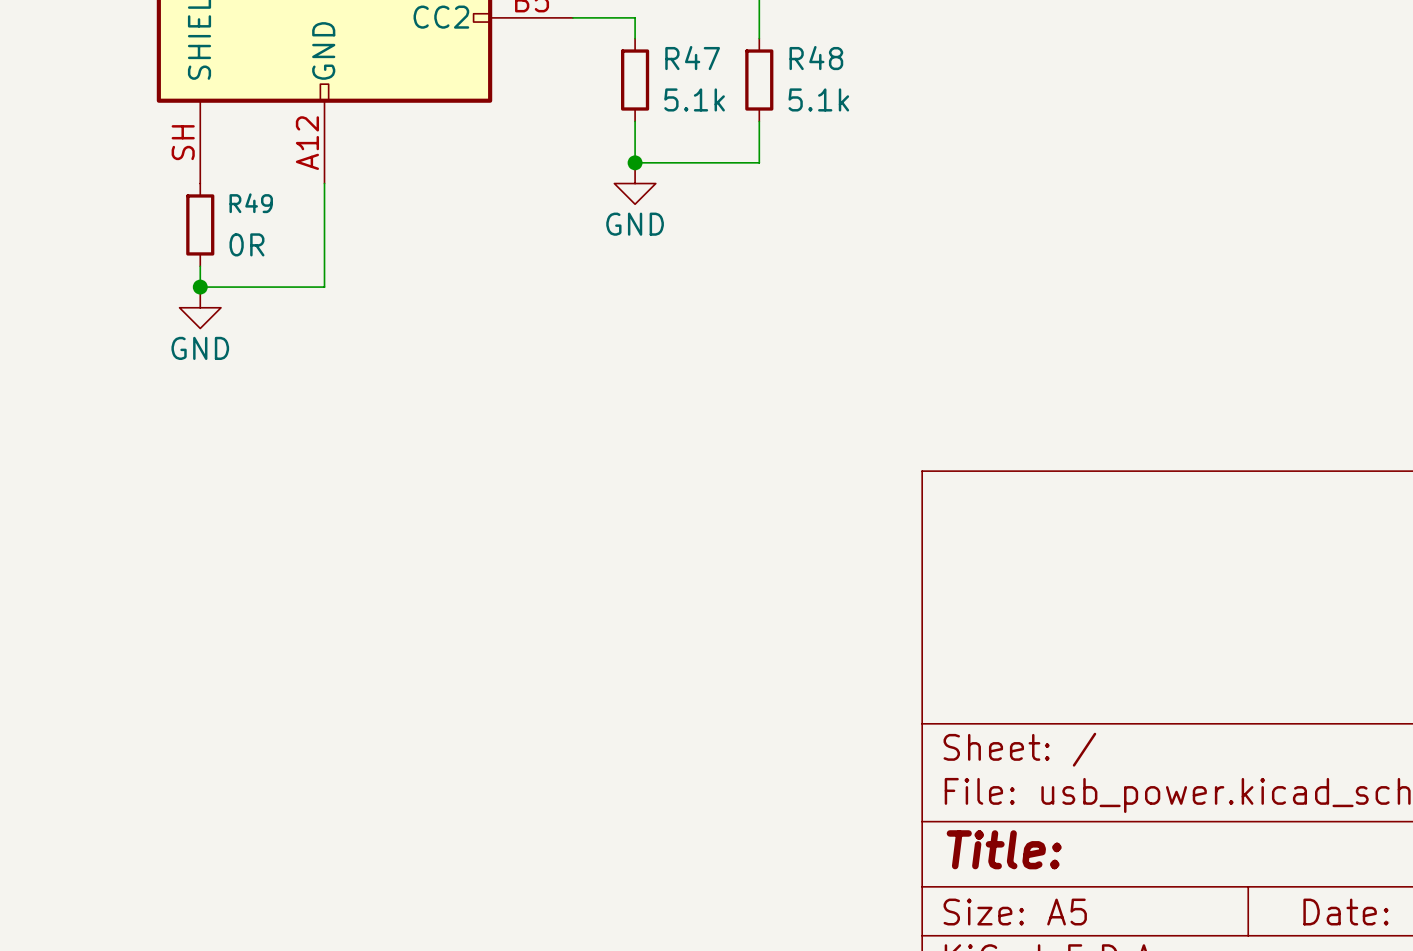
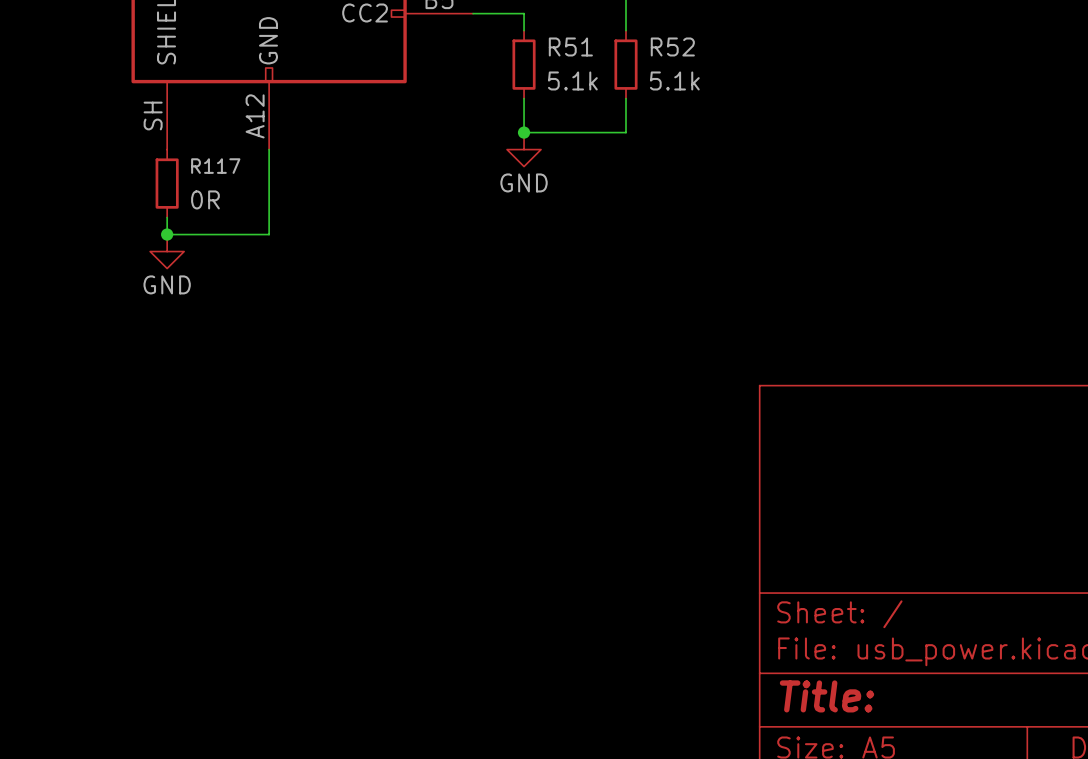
R47 name: R47 (692, 58) -> R51 (570, 46)
R48 name: R48 (816, 58) -> R52 (672, 46)
R49 name: R49 (251, 203) -> R117 (215, 166)

